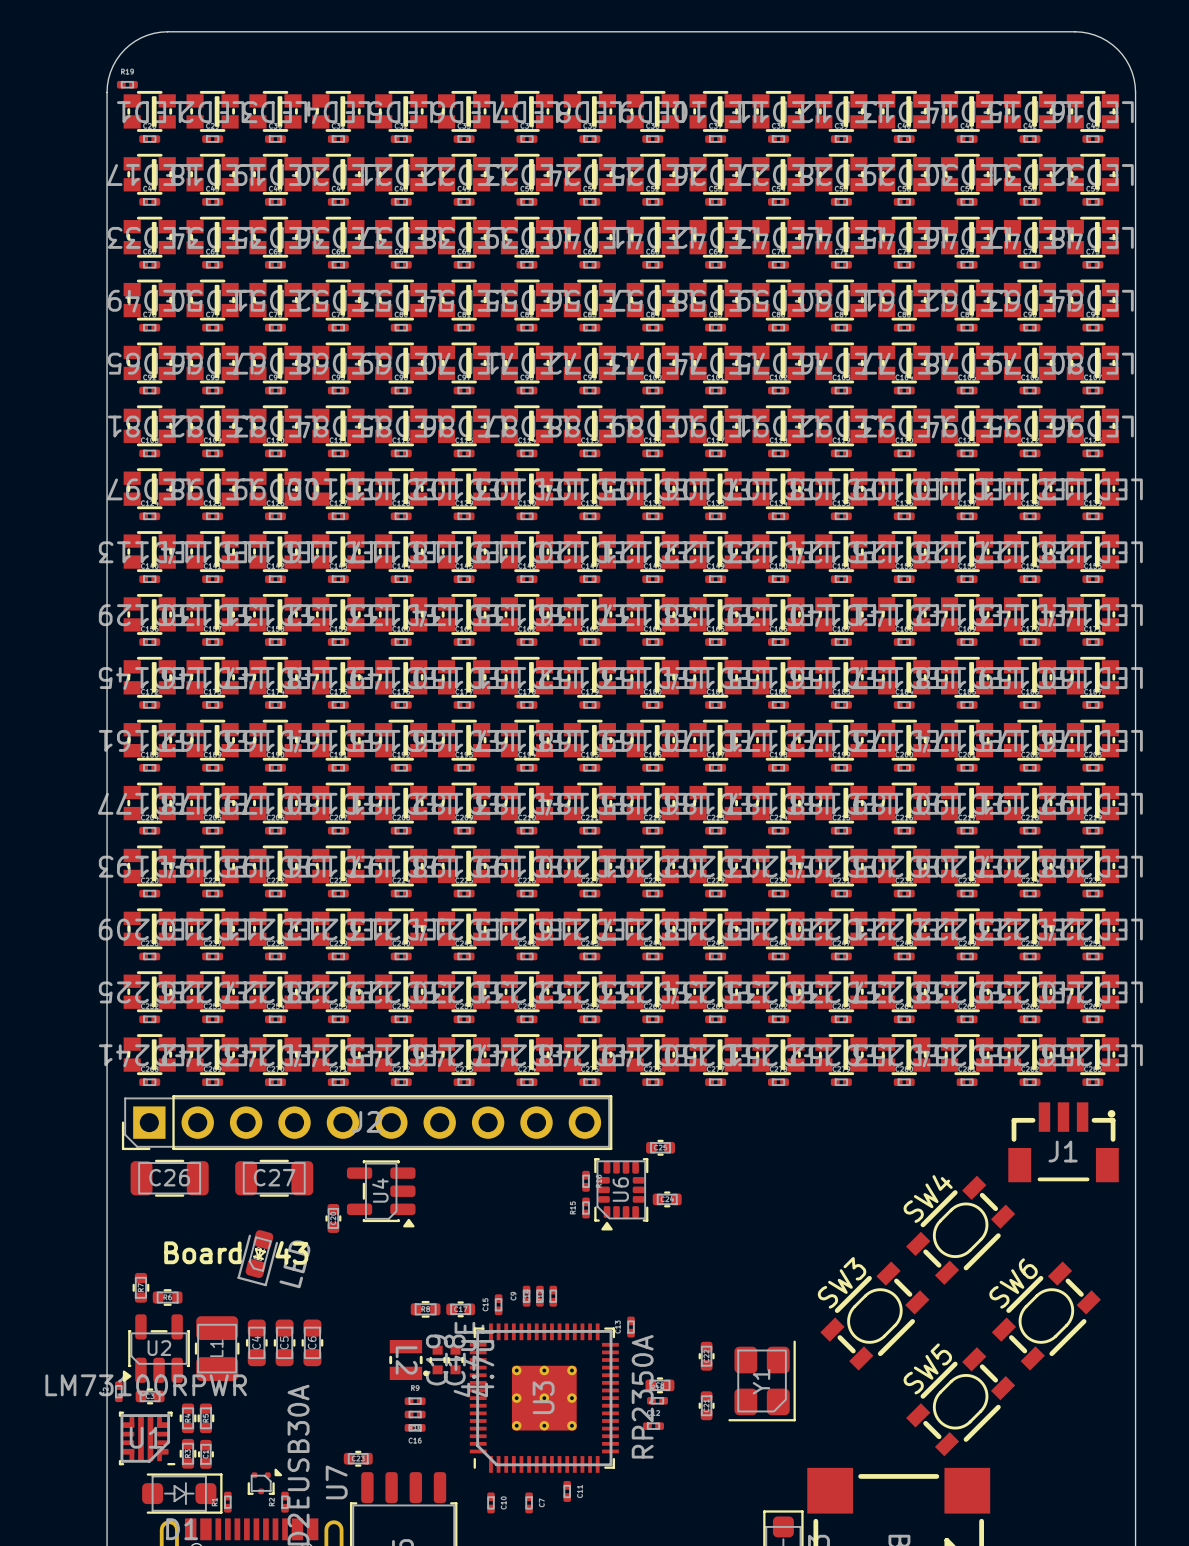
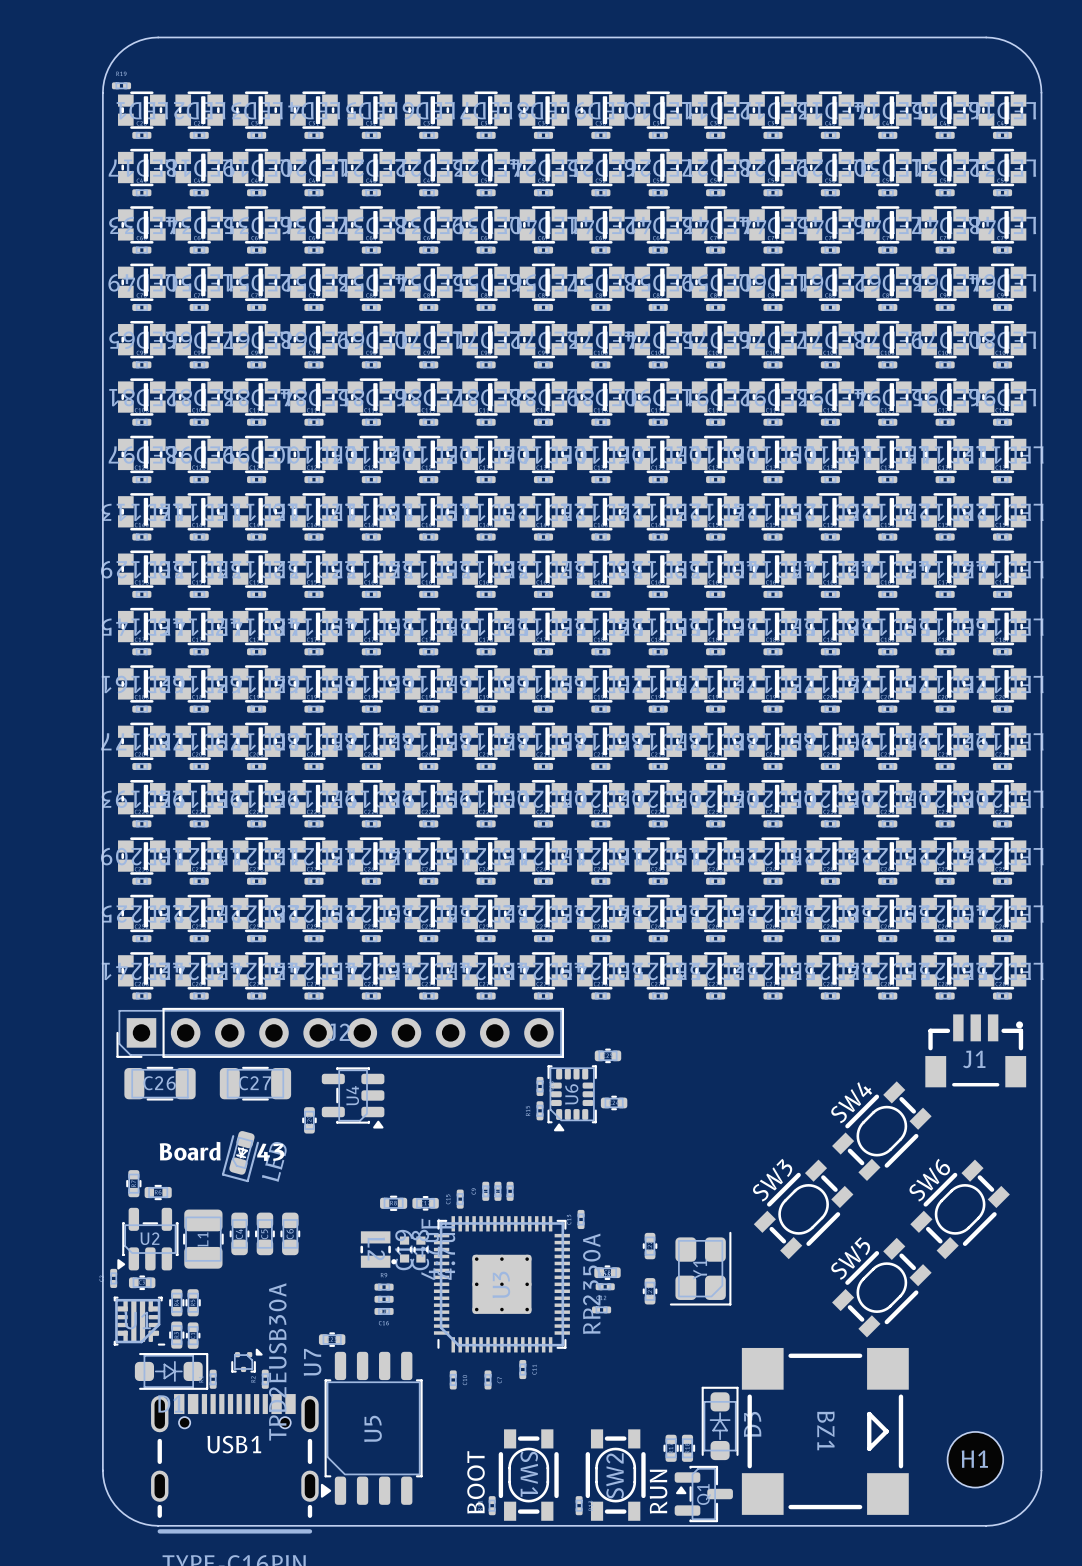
U1 value: LM73100RPWR (146, 1385) -> none

